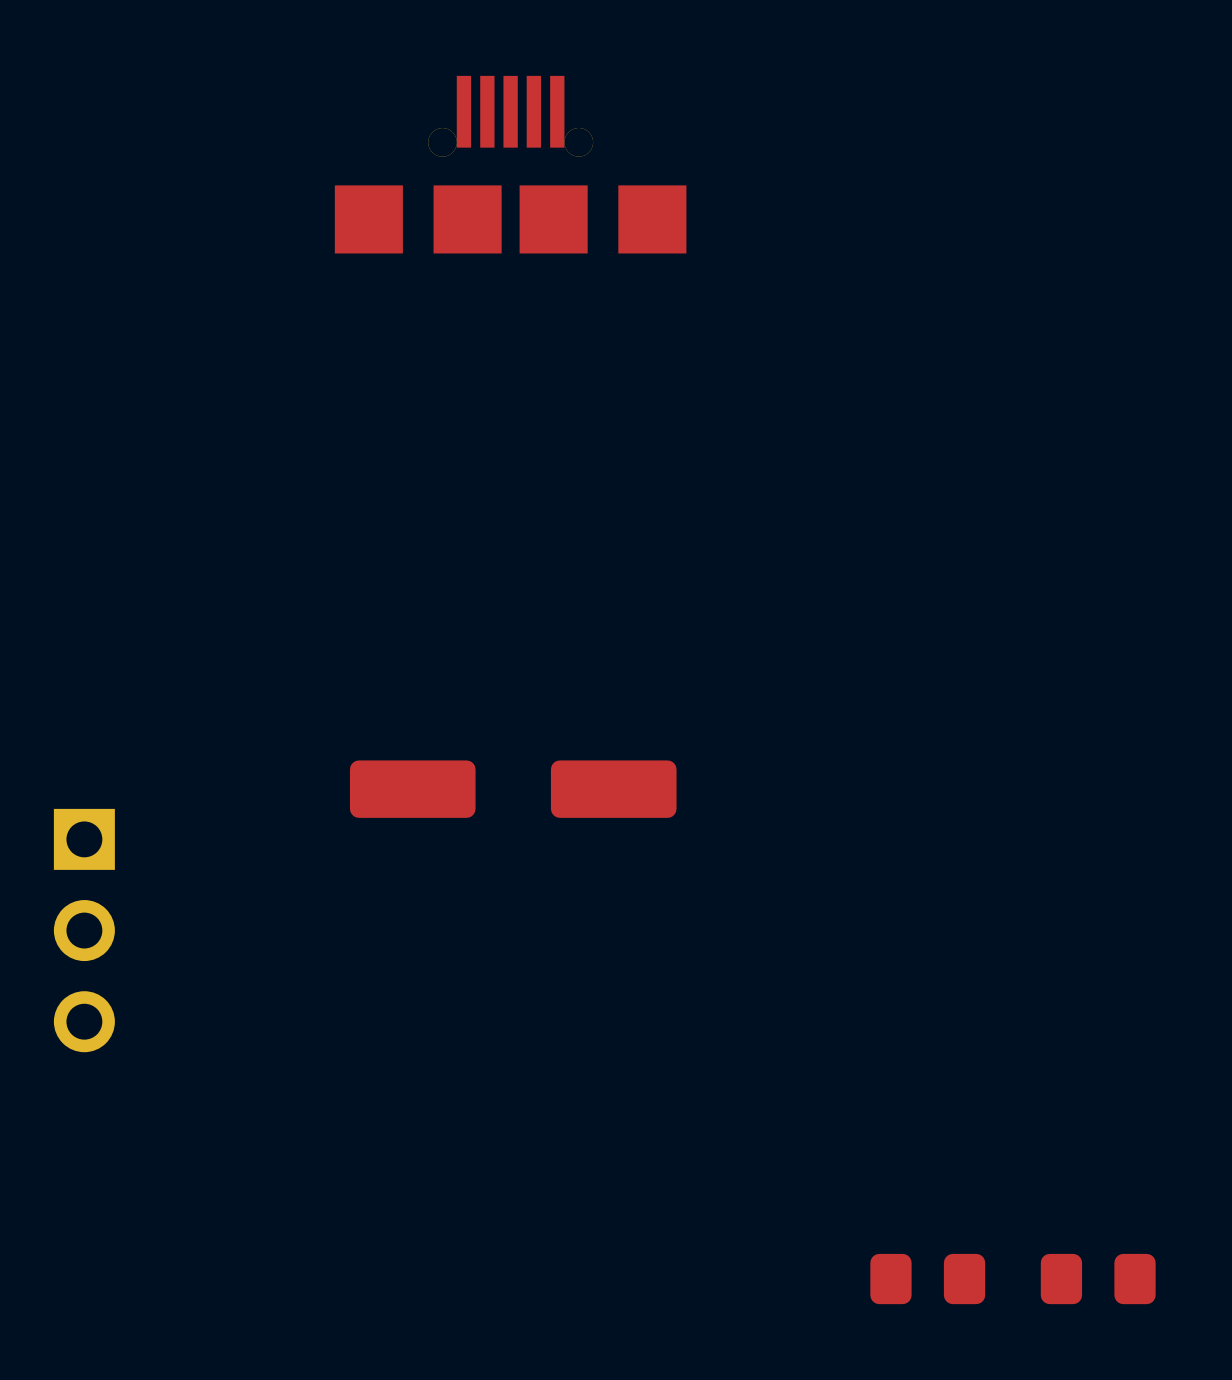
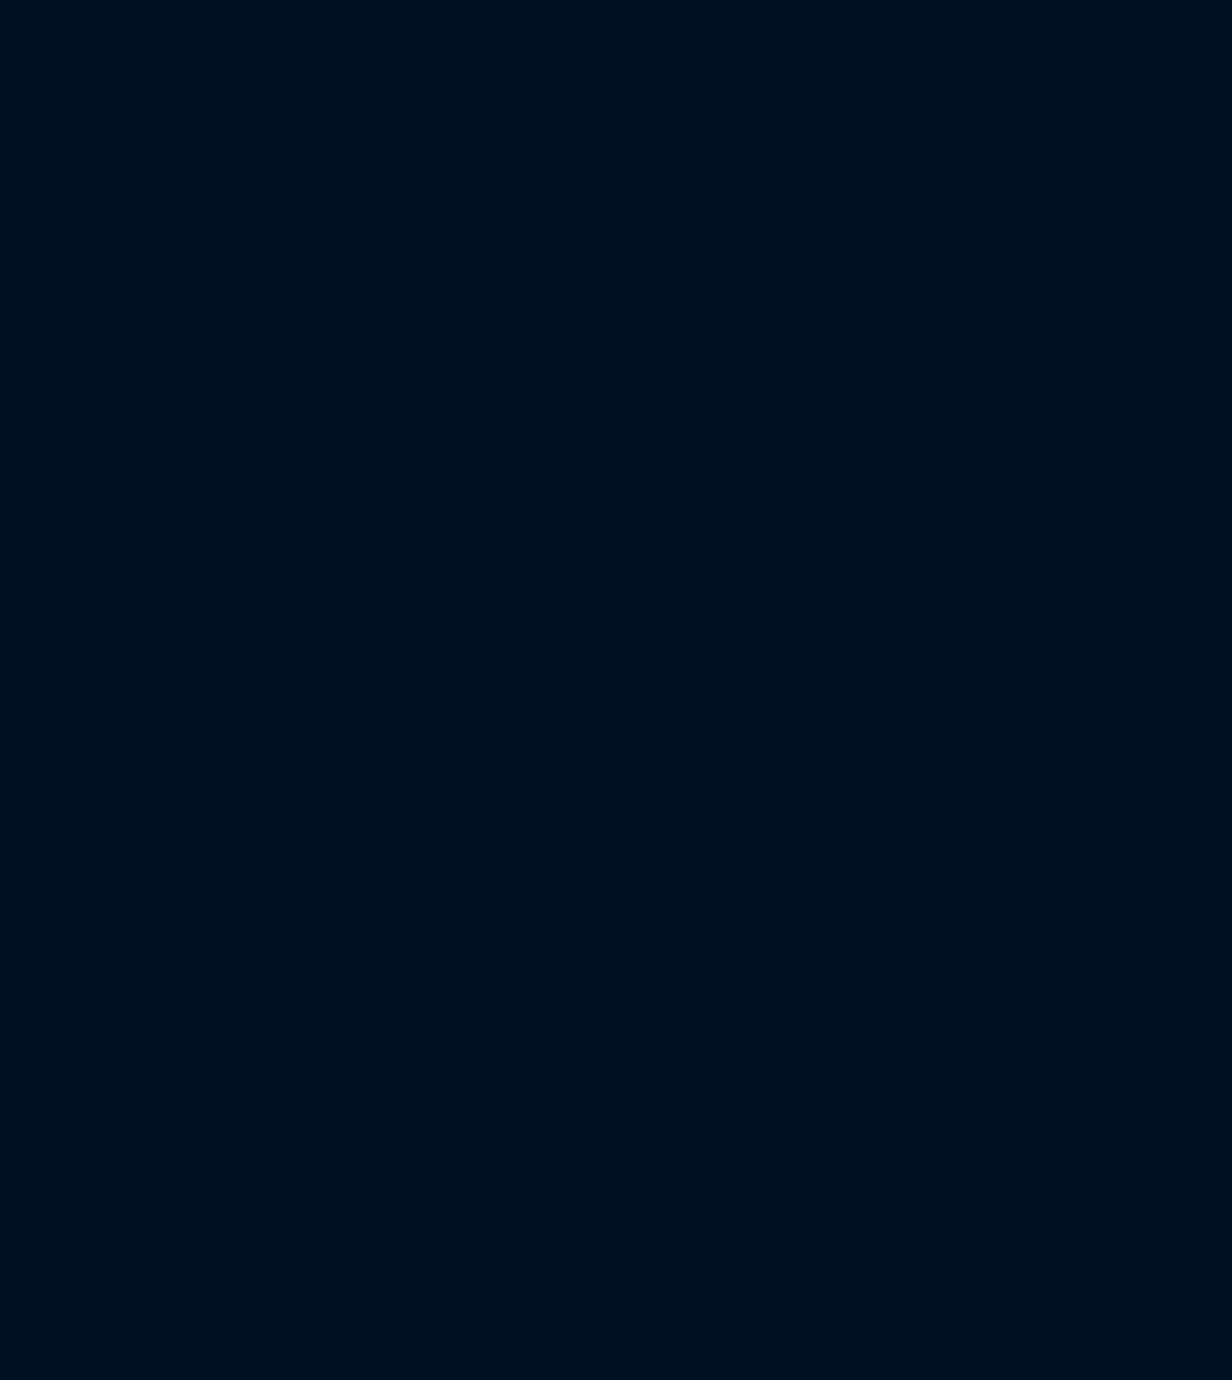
part: (510, 164) -> none
part: (513, 789) -> none
part: (84, 930) -> none
part: (927, 1279) -> none
part: (1098, 1279) -> none

